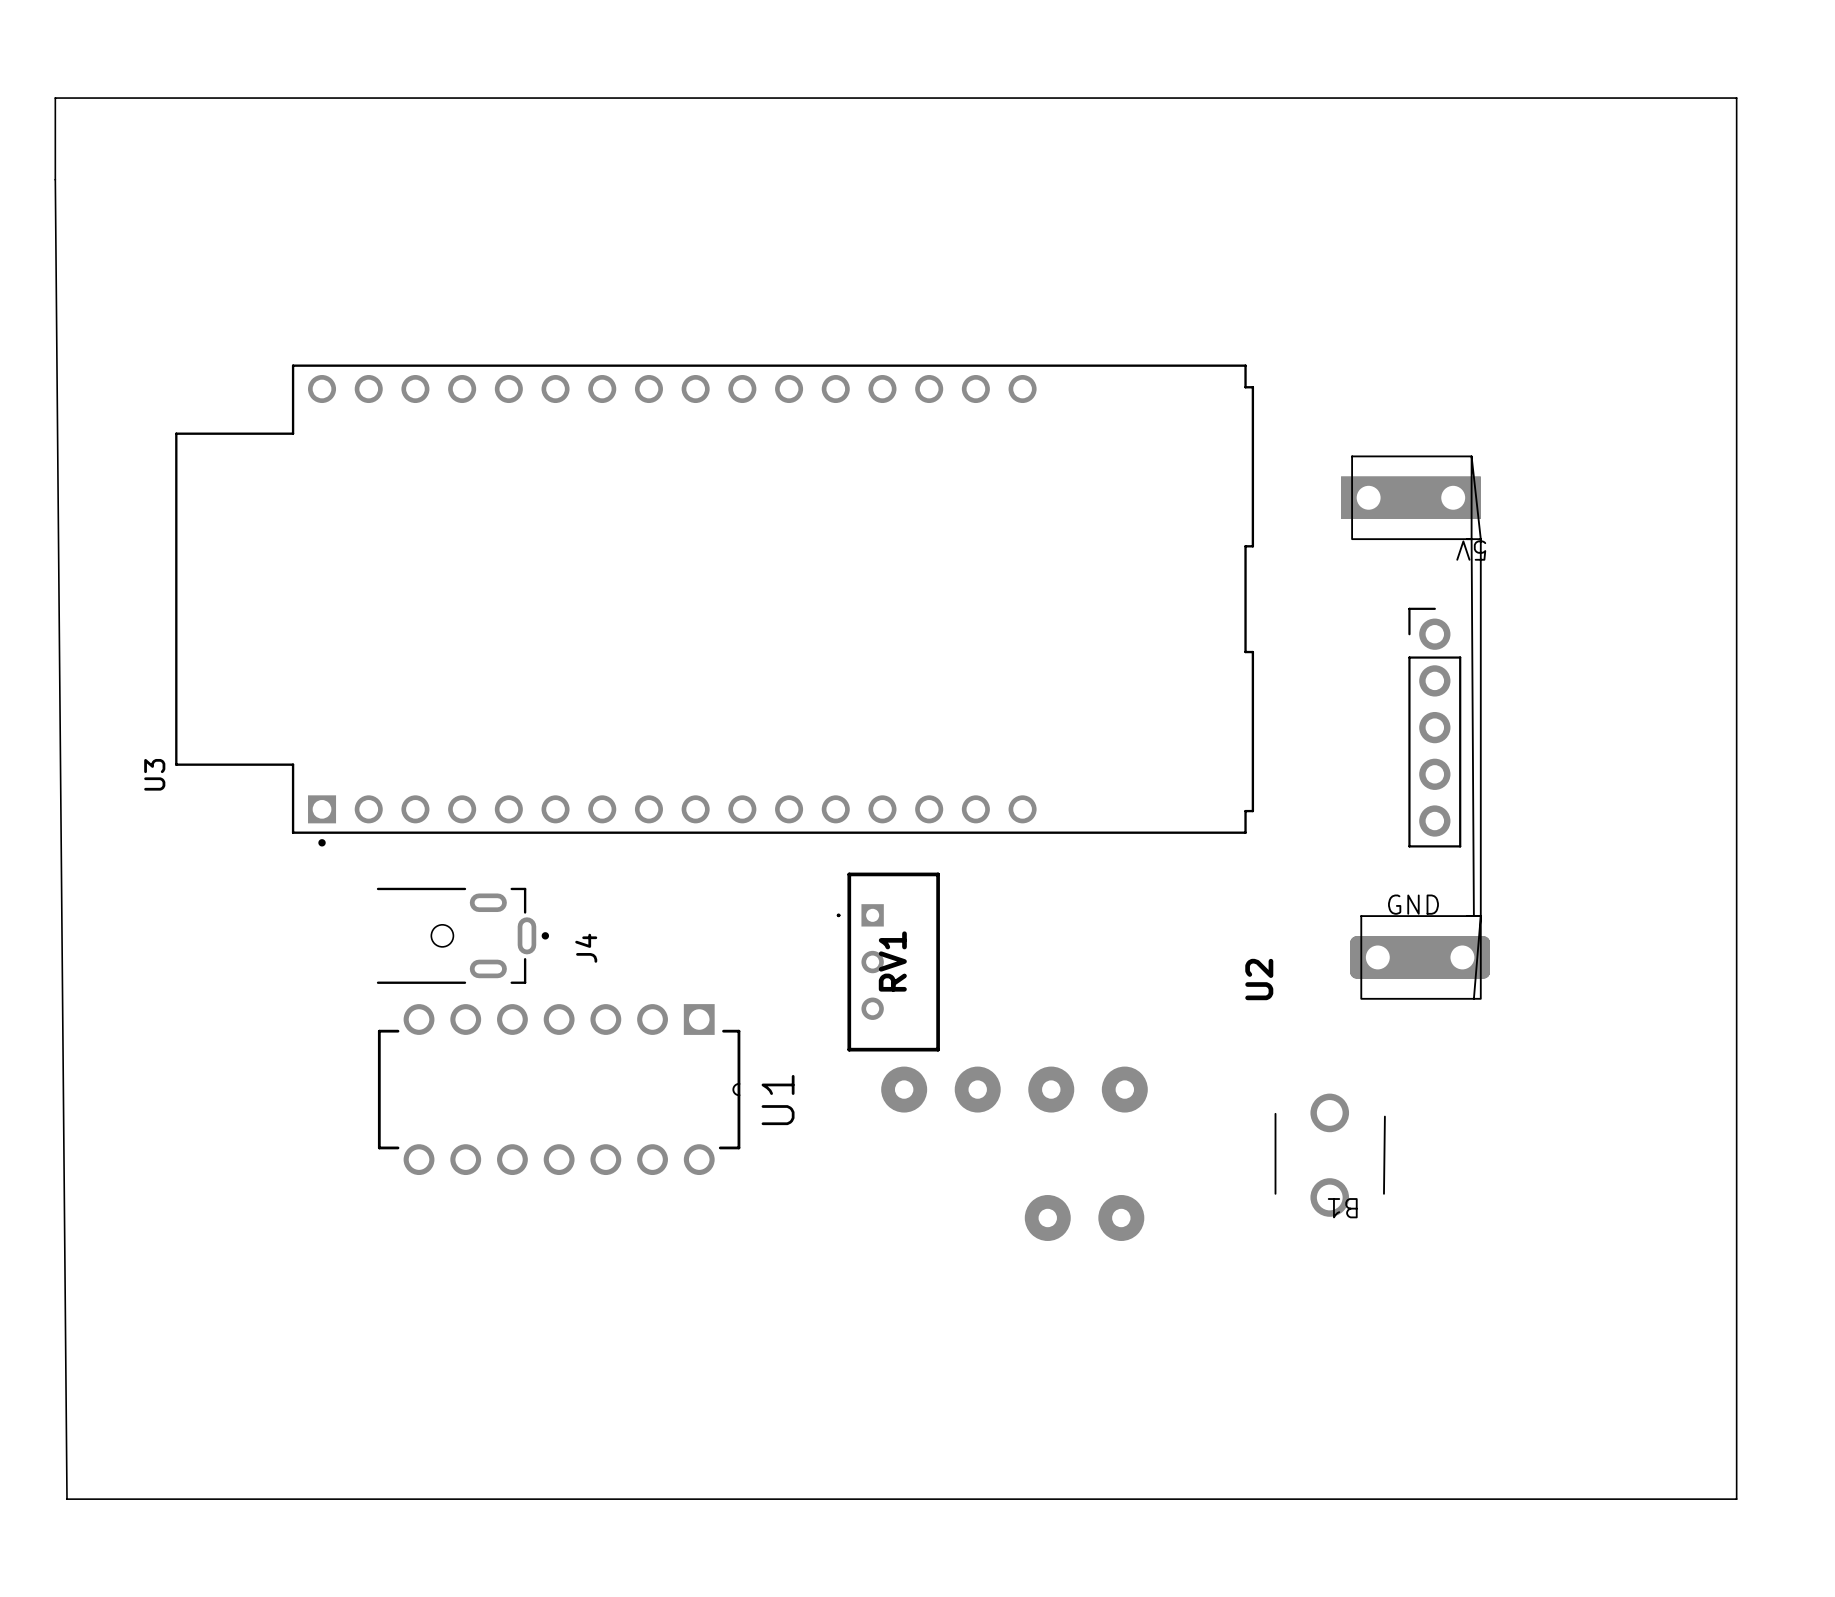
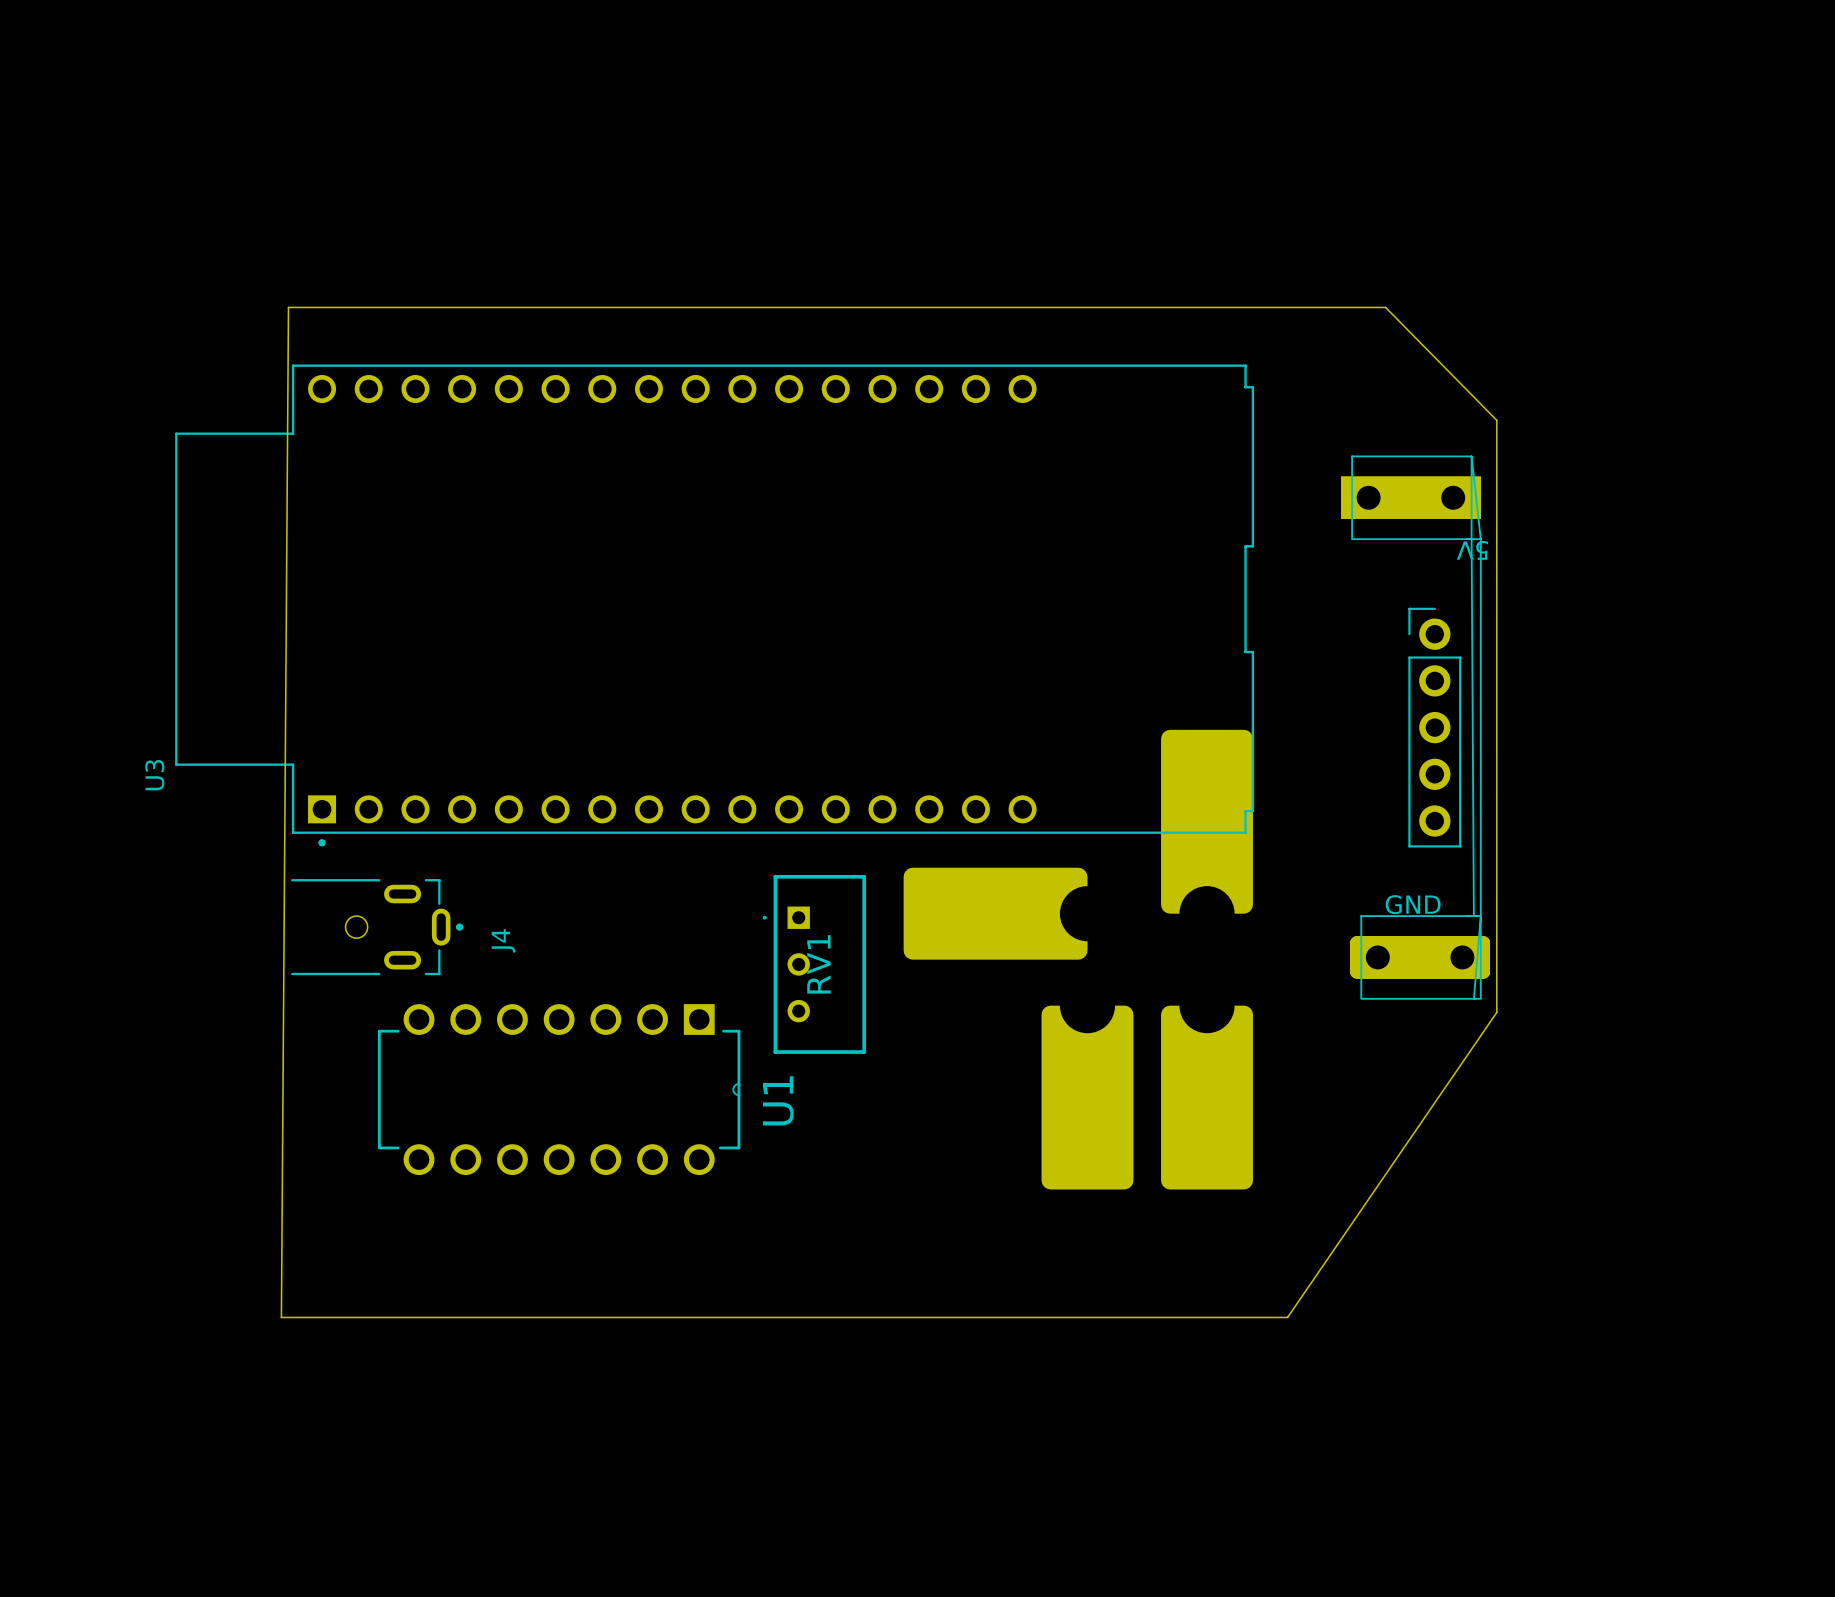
board edge: (55, 98) (67, 1499) (1736, 1499) (1736, 98) (55, 98) -> (288, 307) (281, 1317) (1287, 1317) (1496, 1012) (1496, 420) (1385, 307) (288, 307)
J4 position: (462, 935) -> (377, 927)
part: none -> (1078, 959)
RV1 position: (888, 962) -> (814, 964)
B1: (1014, 1089) -> none
U2: (1330, 1155) -> none
part: (1084, 1217) -> none

